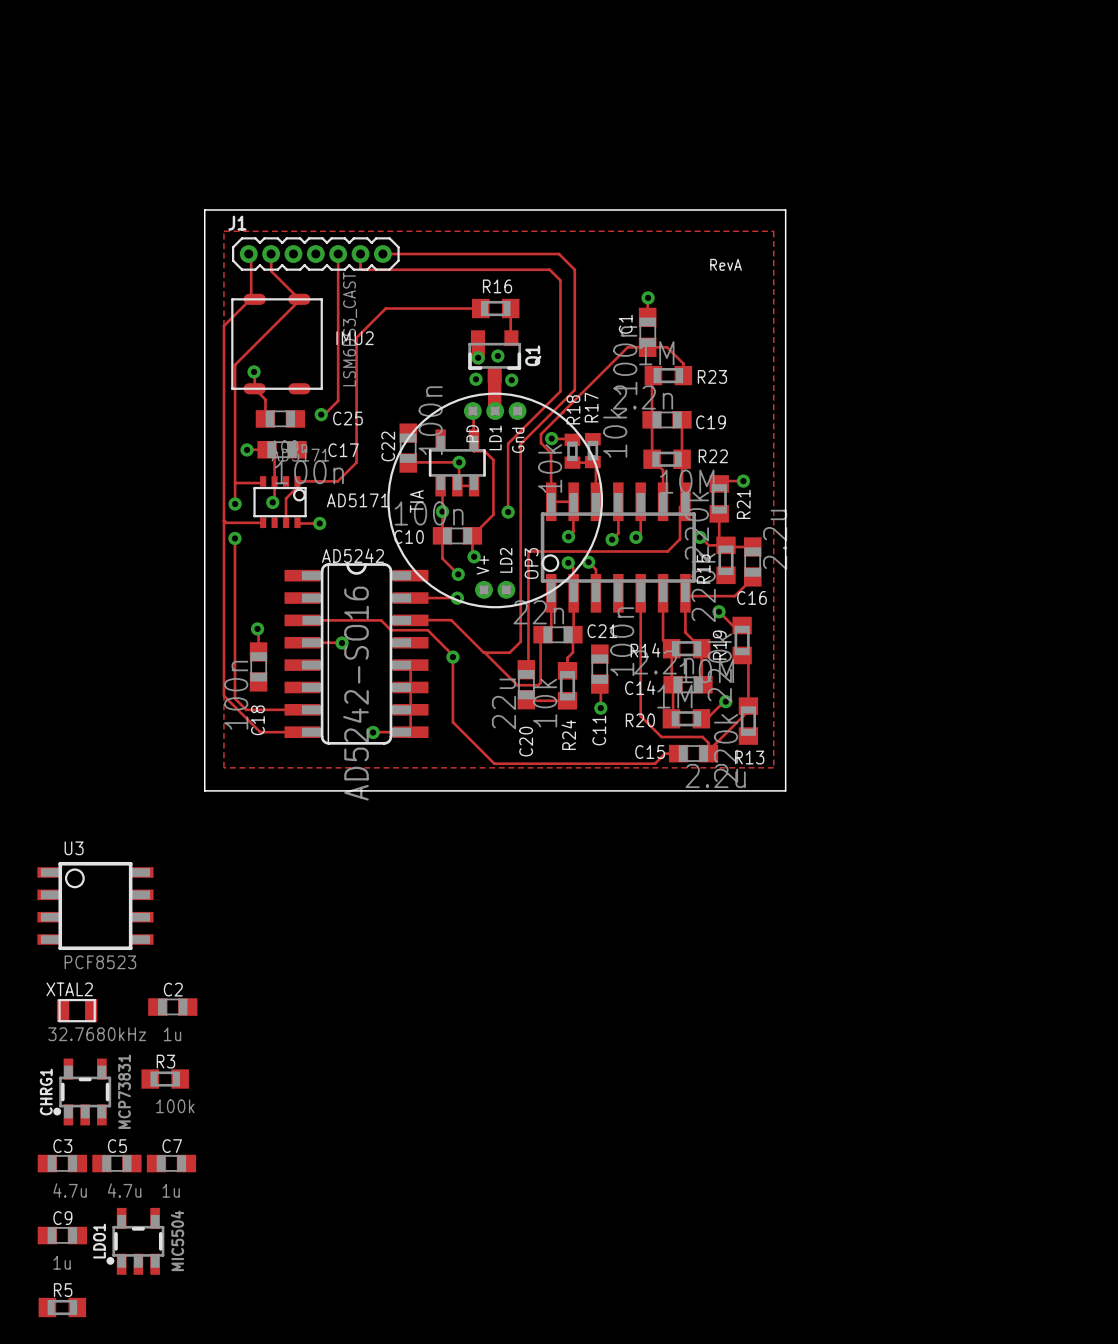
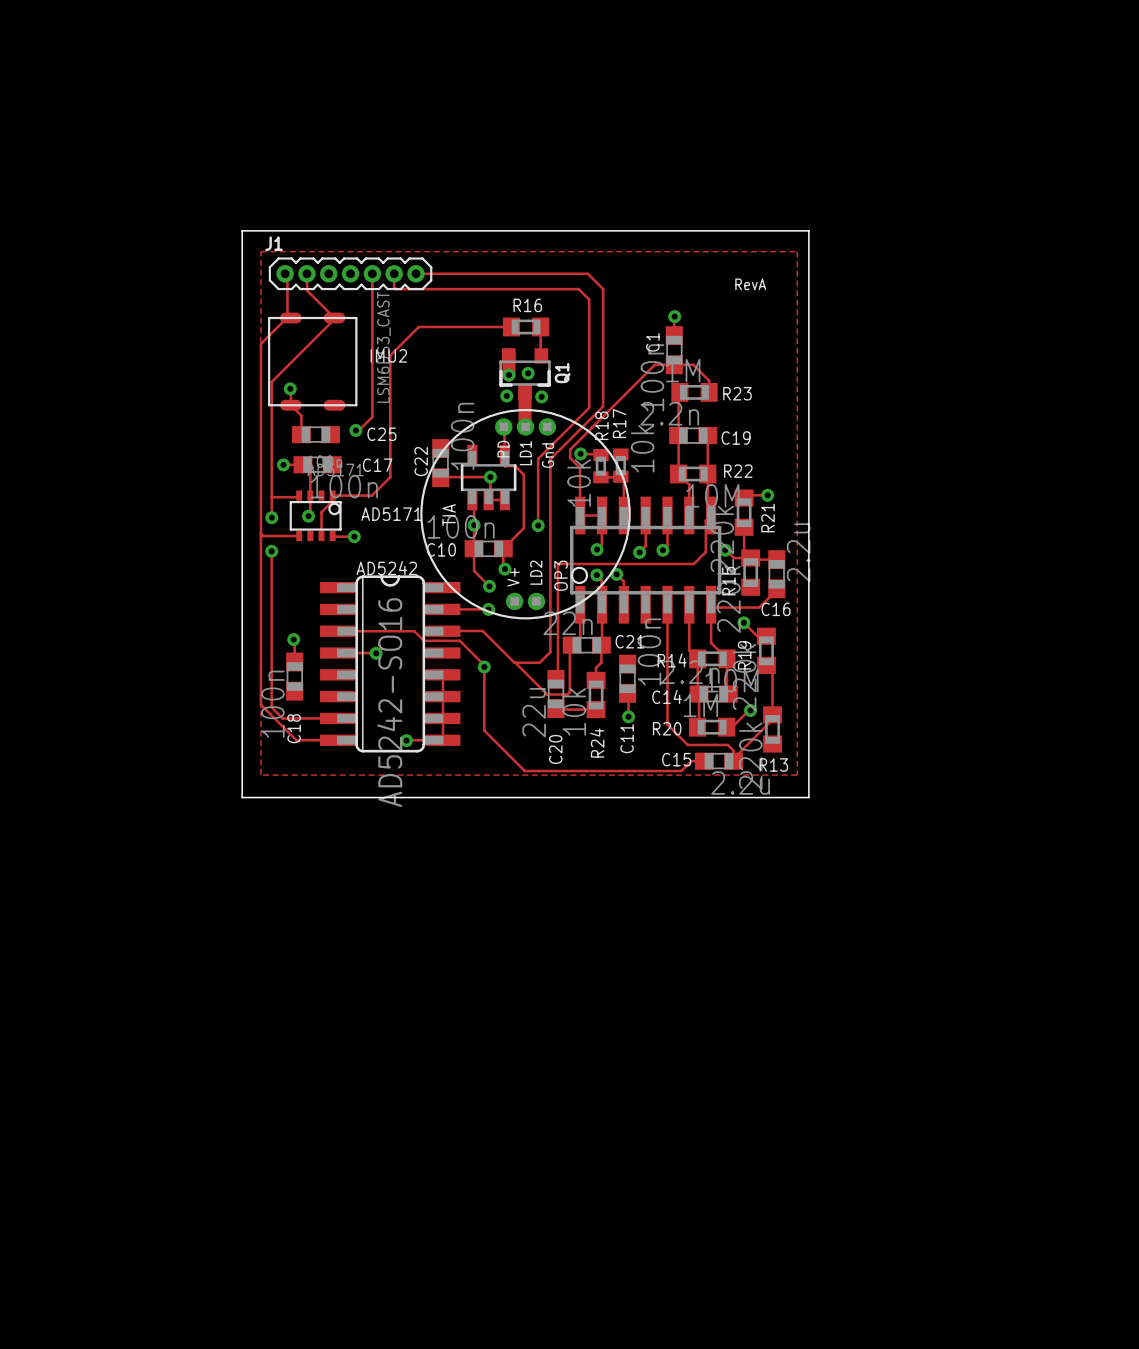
U3: PCF8523 (95, 906) -> none
C2: 1u (172, 1007) -> none
XTAL2: 32.7680kHz (77, 1010) -> none
R3: 100k (165, 1079) -> none
CHRG1: MCP73831 (82, 1092) -> none
C3: 4.7u (62, 1163) -> none
C5: 4.7u (116, 1163) -> none
C7: 1u (171, 1163) -> none
C9: 1u (62, 1235) -> none
LDO1: MIC5504 (135, 1241) -> none
R5: (62, 1307) -> none

